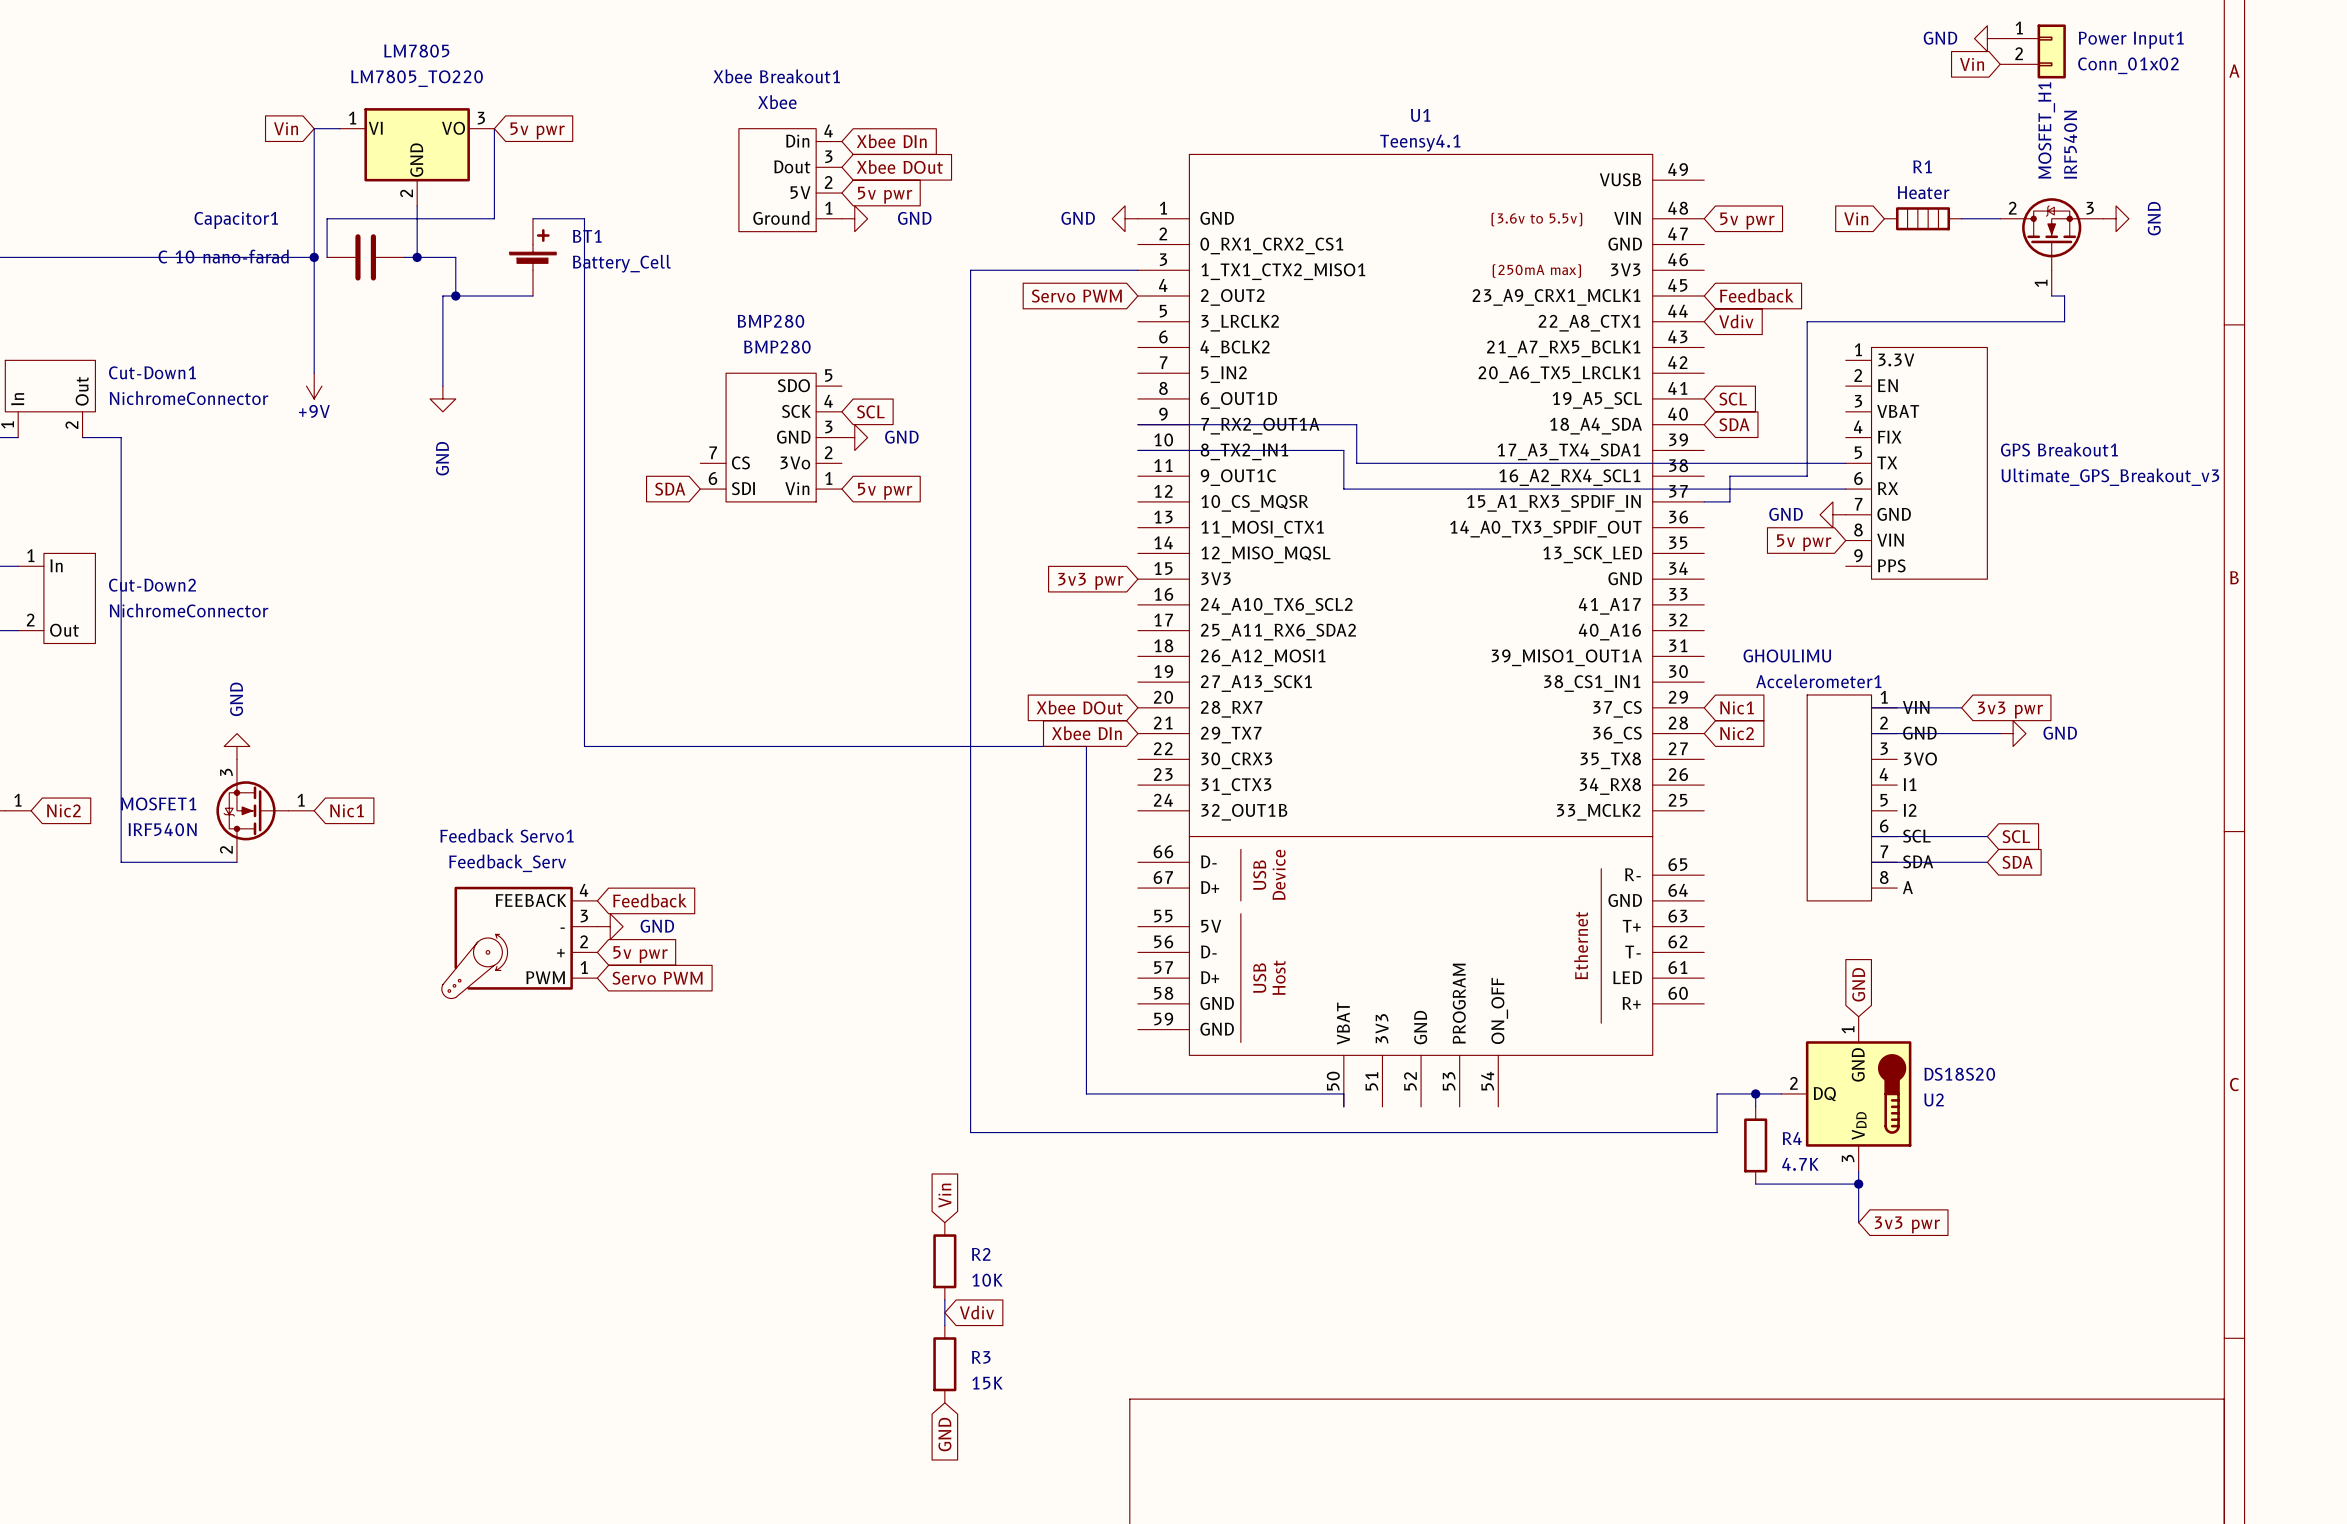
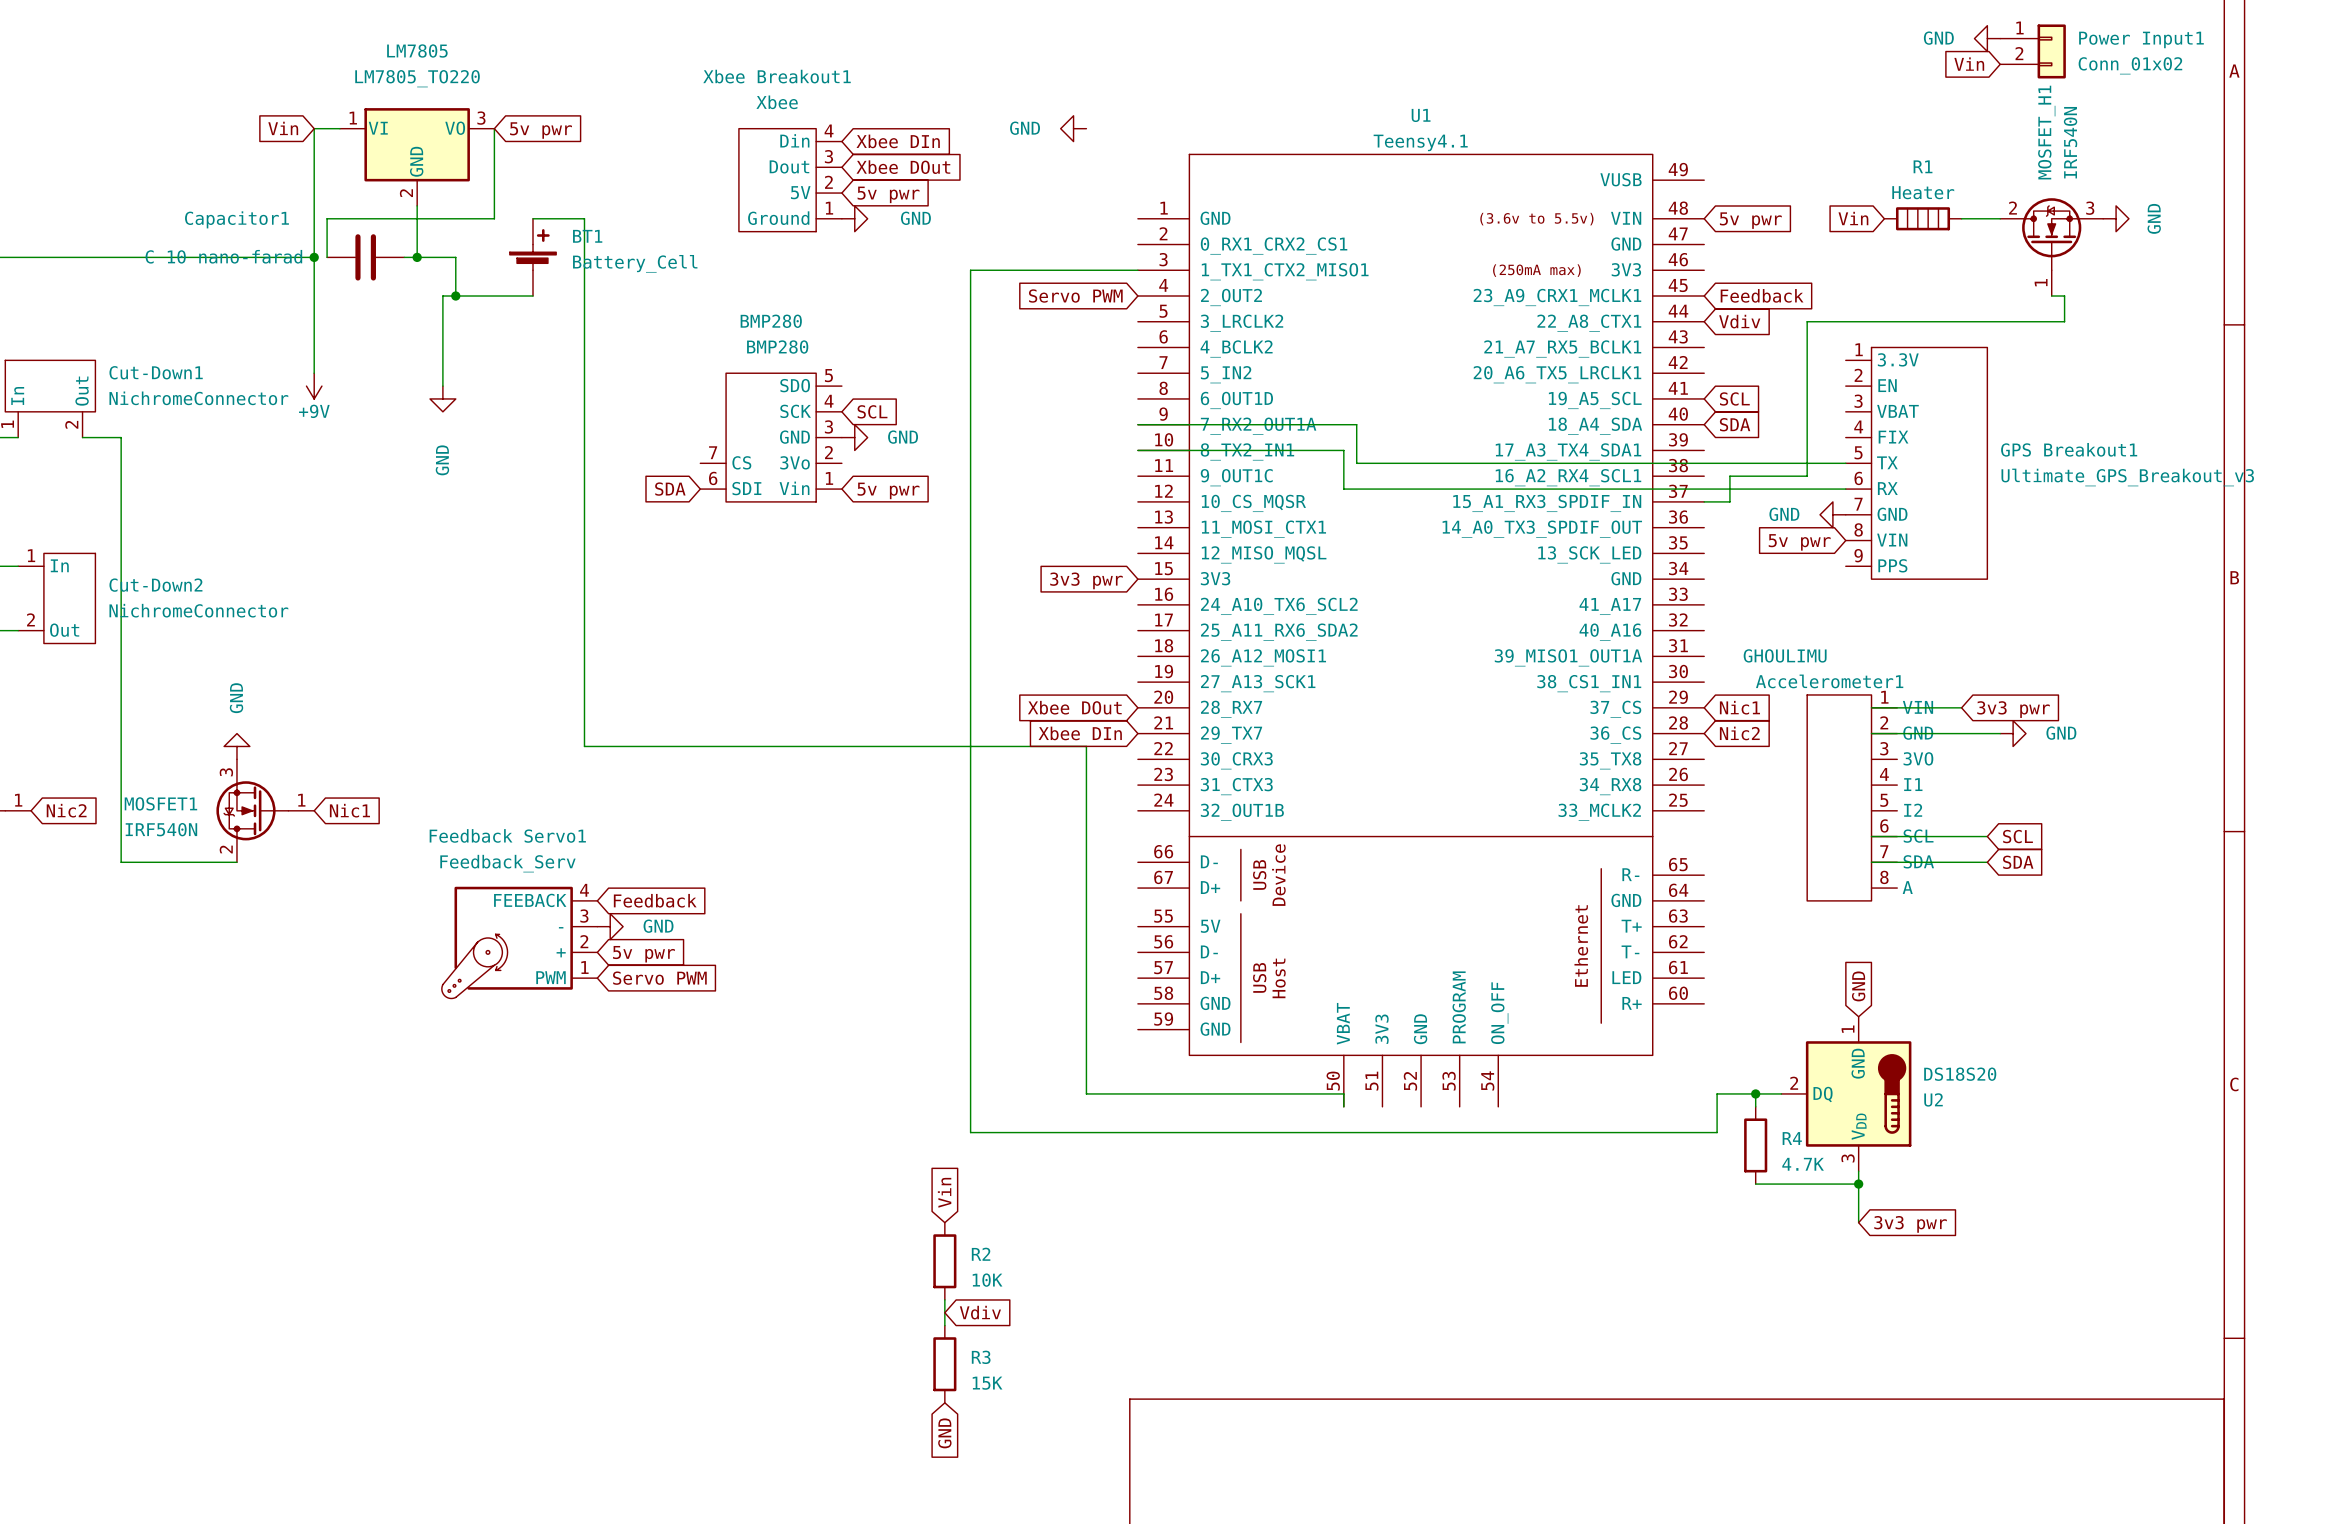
power symbol position: GND (1125, 218) -> GND (1073, 128)

